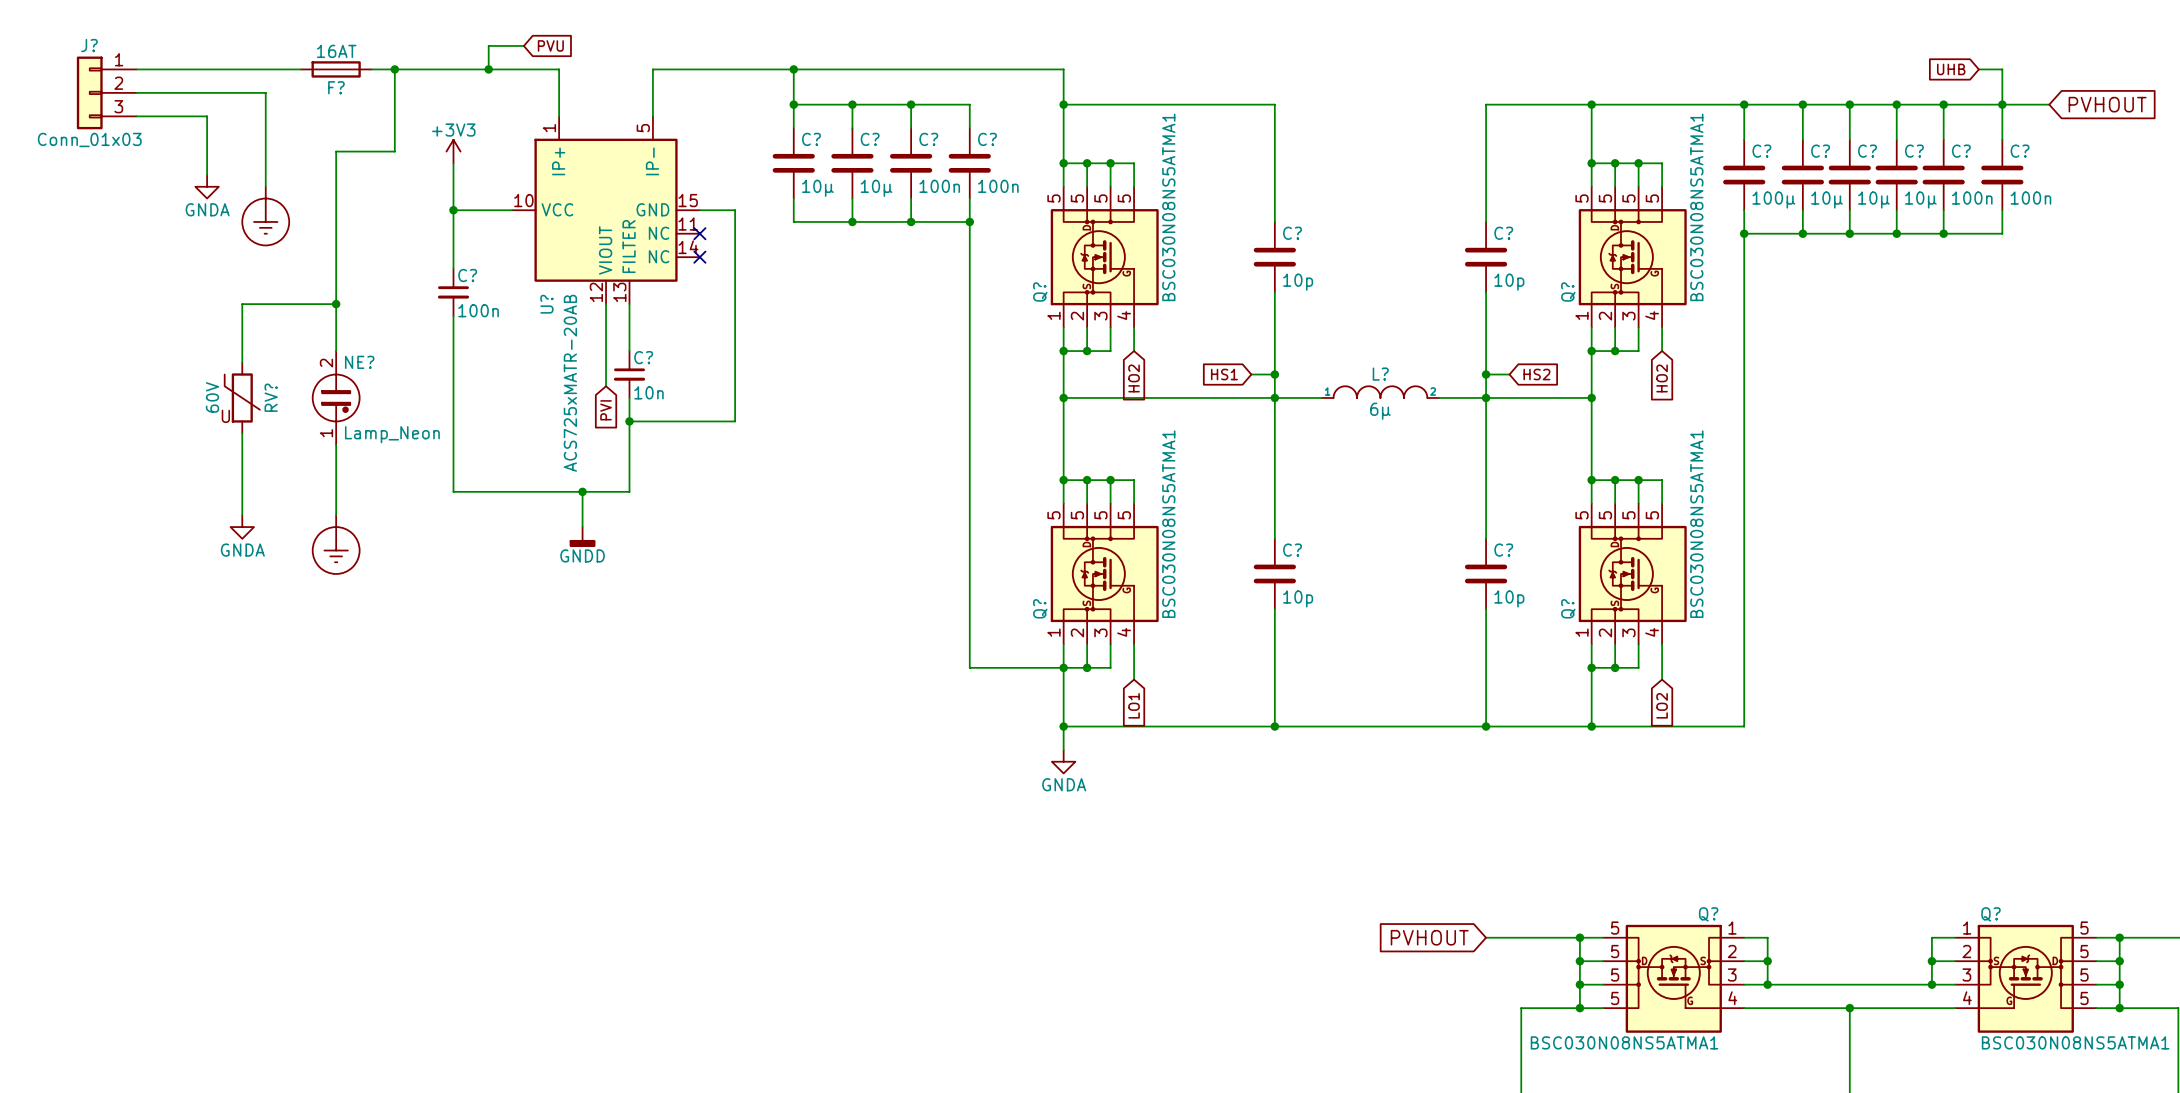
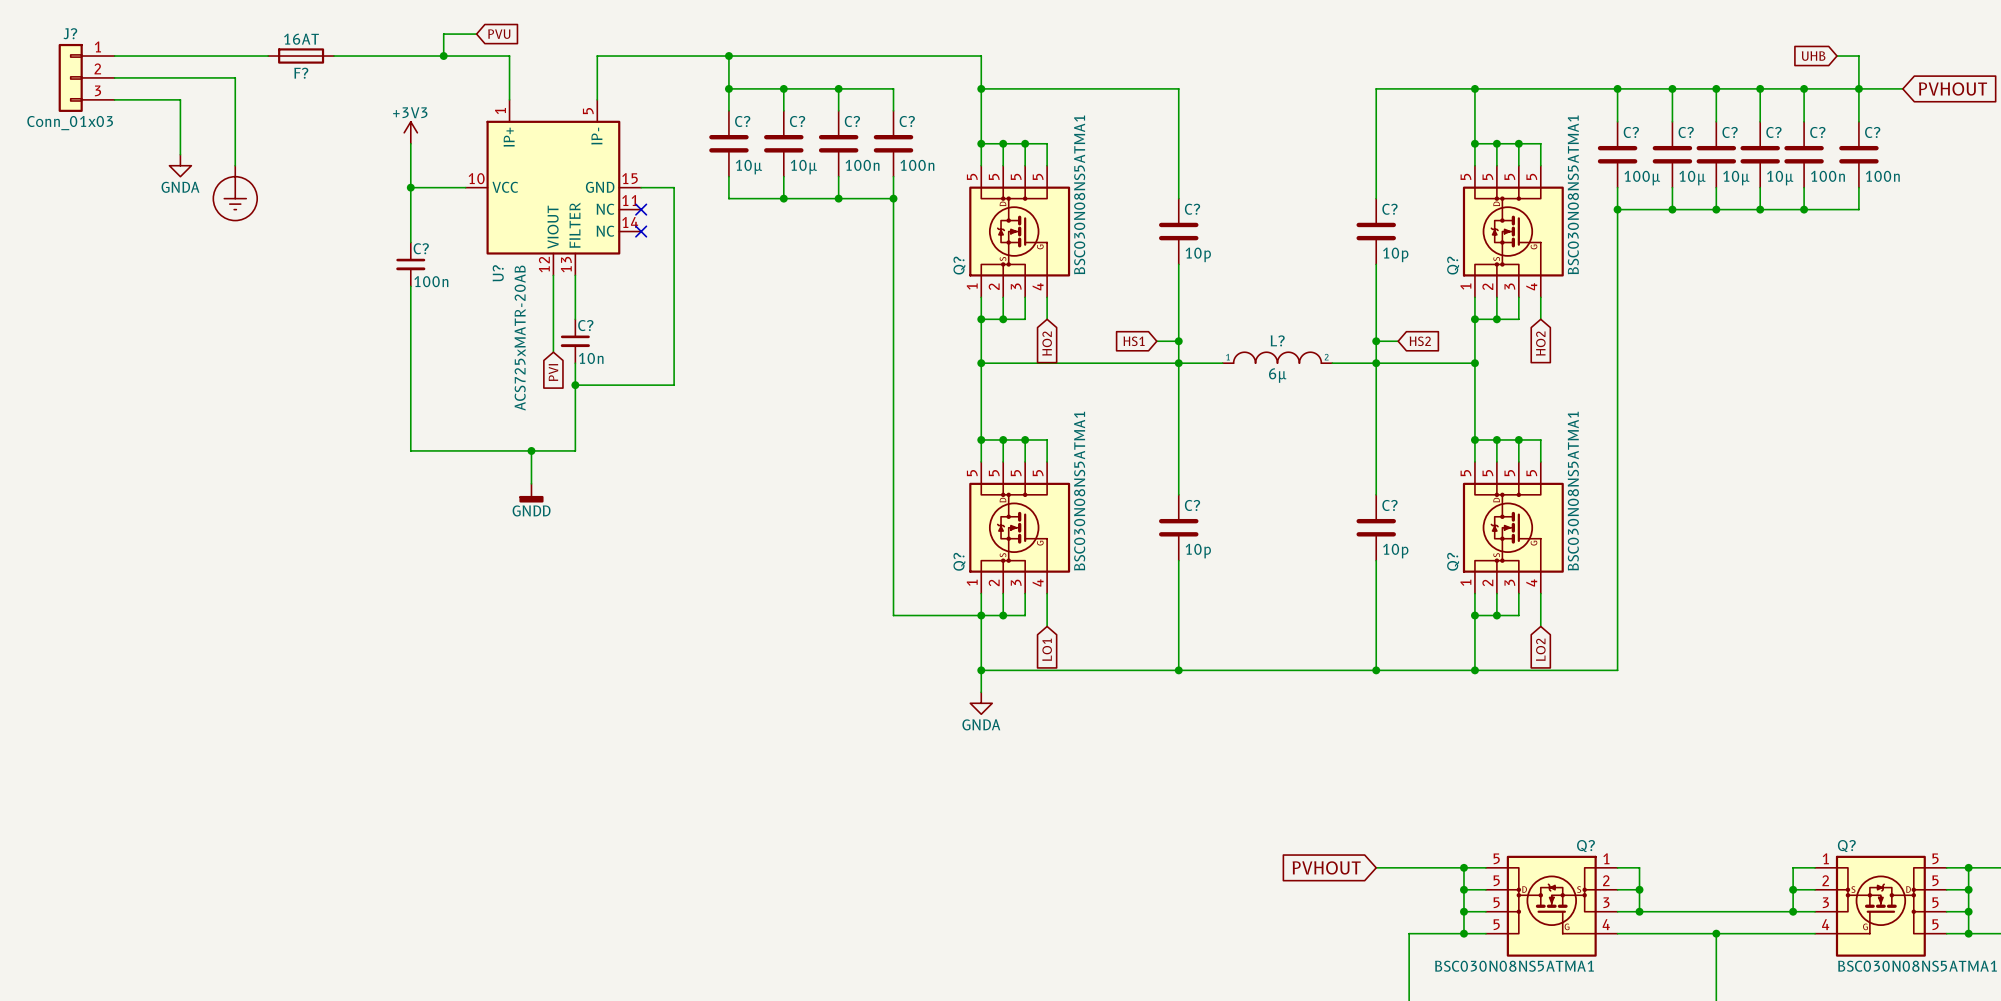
wire: (394, 69) (394, 151) (336, 151) (336, 351) -> none
junction: (394, 69) -> none
wire: (336, 304) (242, 304) (242, 362) -> none
junction: (336, 304) -> none
RV?: 60V (242, 397) -> none
NE?: Lamp_Neon (336, 397) -> none
wire: (242, 433) (242, 515) -> none
wire: (336, 444) (336, 515) -> none
power symbol: GNDA (242, 527) -> none
power symbol: (336, 544) -> none

